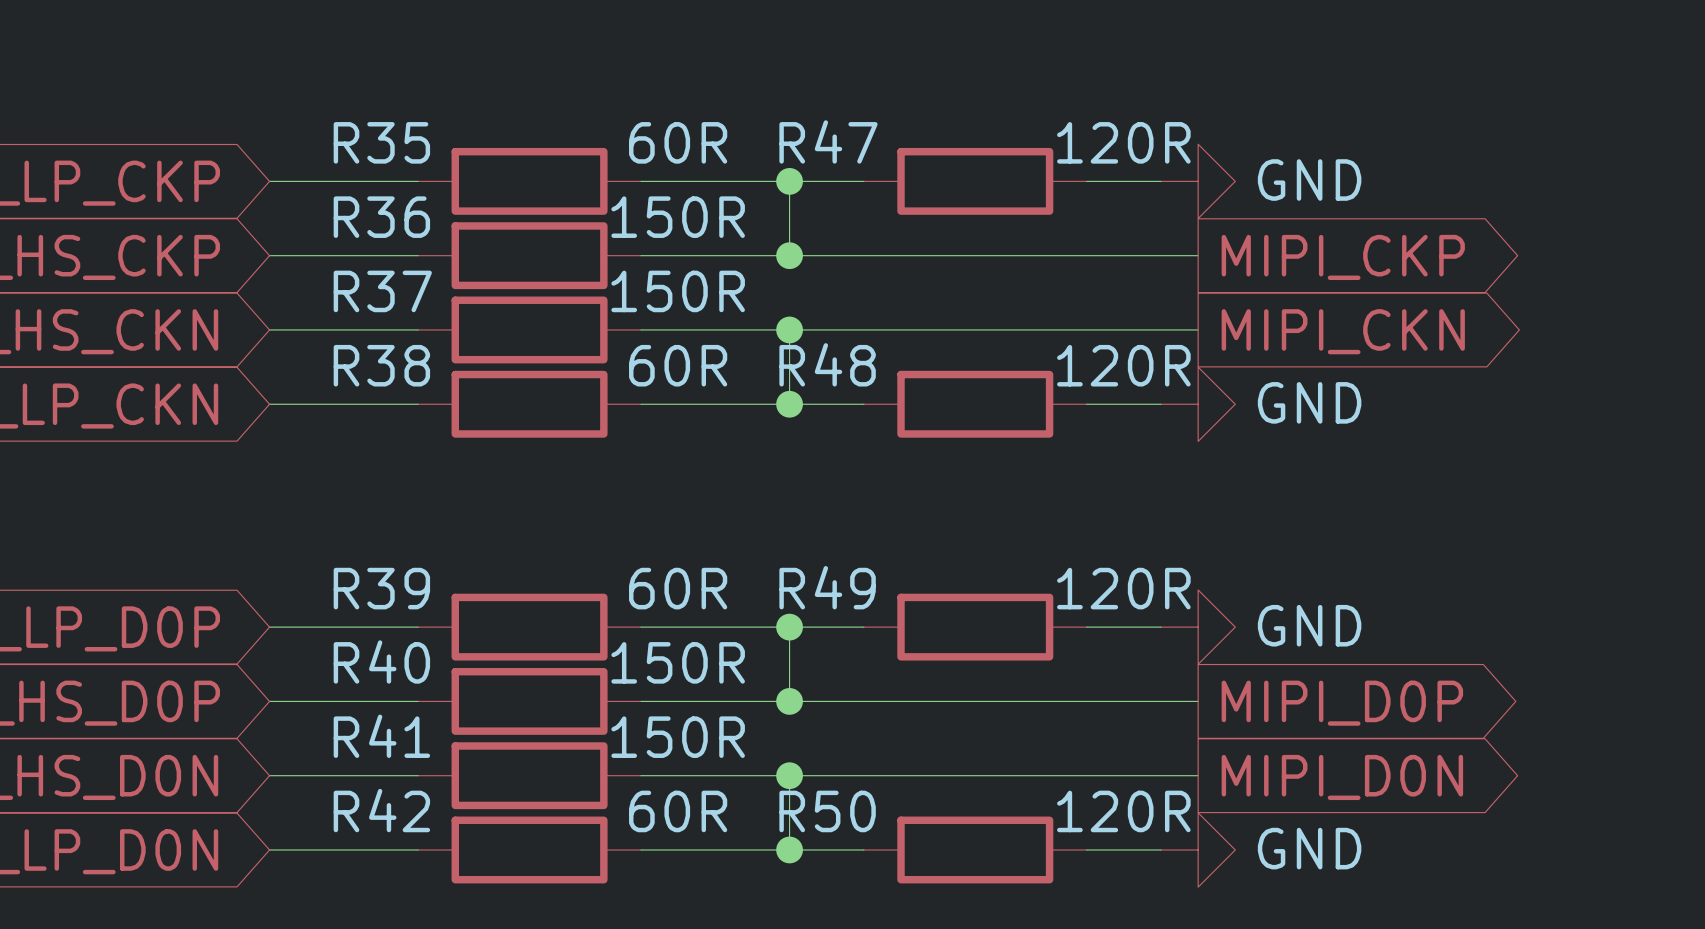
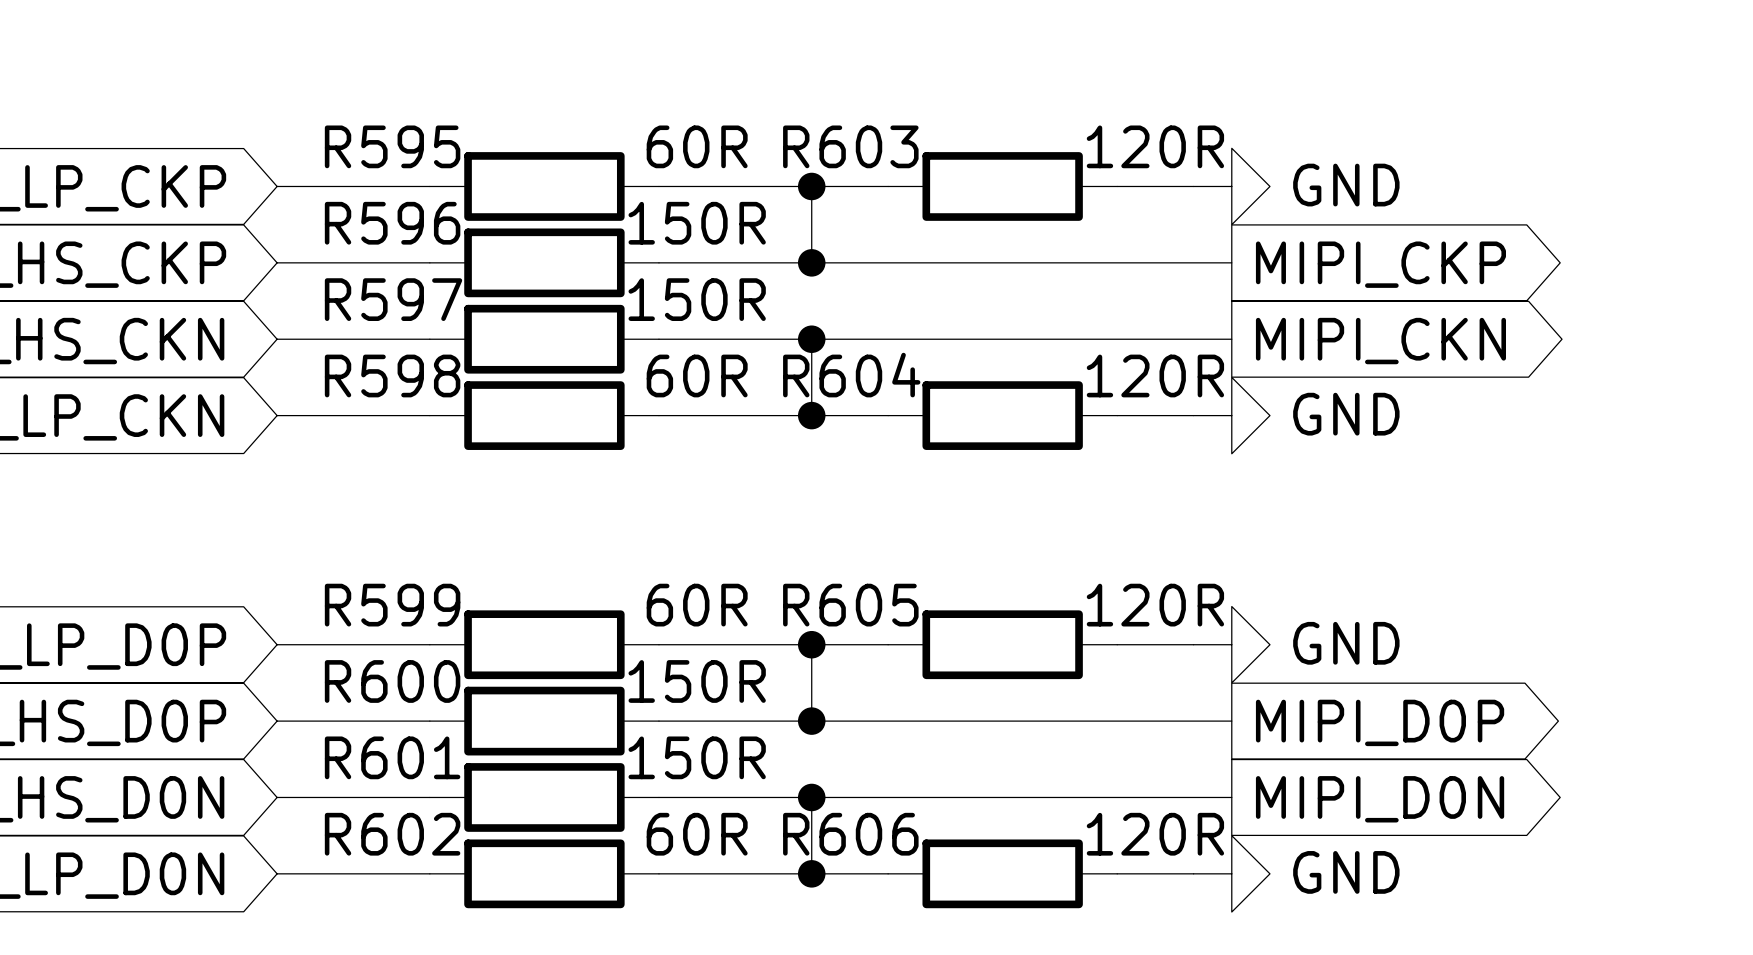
R47 name: R47 (828, 141) -> R603 (850, 146)
R35 name: R35 (381, 142) -> R595 (392, 146)
R36 name: R36 (381, 217) -> R596 (392, 223)
R37 name: R37 (382, 291) -> R597 (393, 299)
R48 name: R48 (827, 364) -> R604 (851, 375)
R38 name: R38 (381, 365) -> R598 (392, 375)
R49 name: R49 (827, 587) -> R605 (850, 605)
R39 name: R39 (381, 588) -> R599 (392, 605)
R40 name: R40 (381, 661) -> R600 (392, 681)
R41 name: R41 (381, 736) -> R601 (392, 757)
R42 name: R42 (381, 810) -> R602 (392, 834)
R50 name: R50 (827, 811) -> R606 (850, 834)

